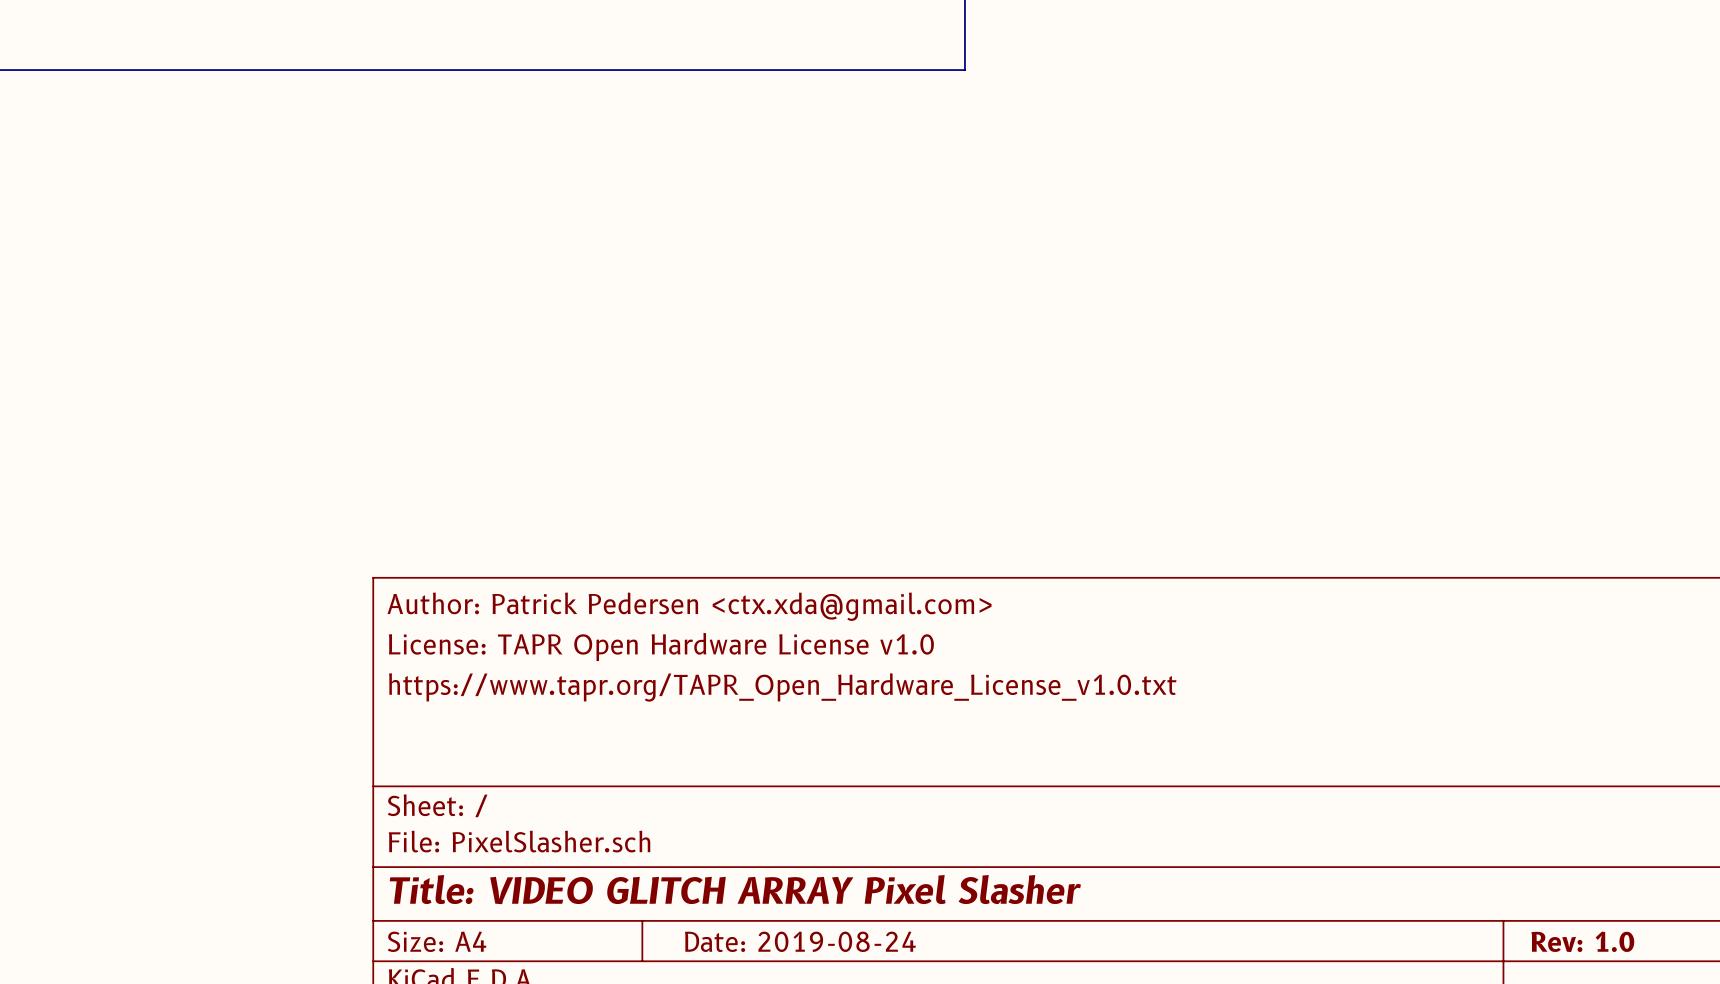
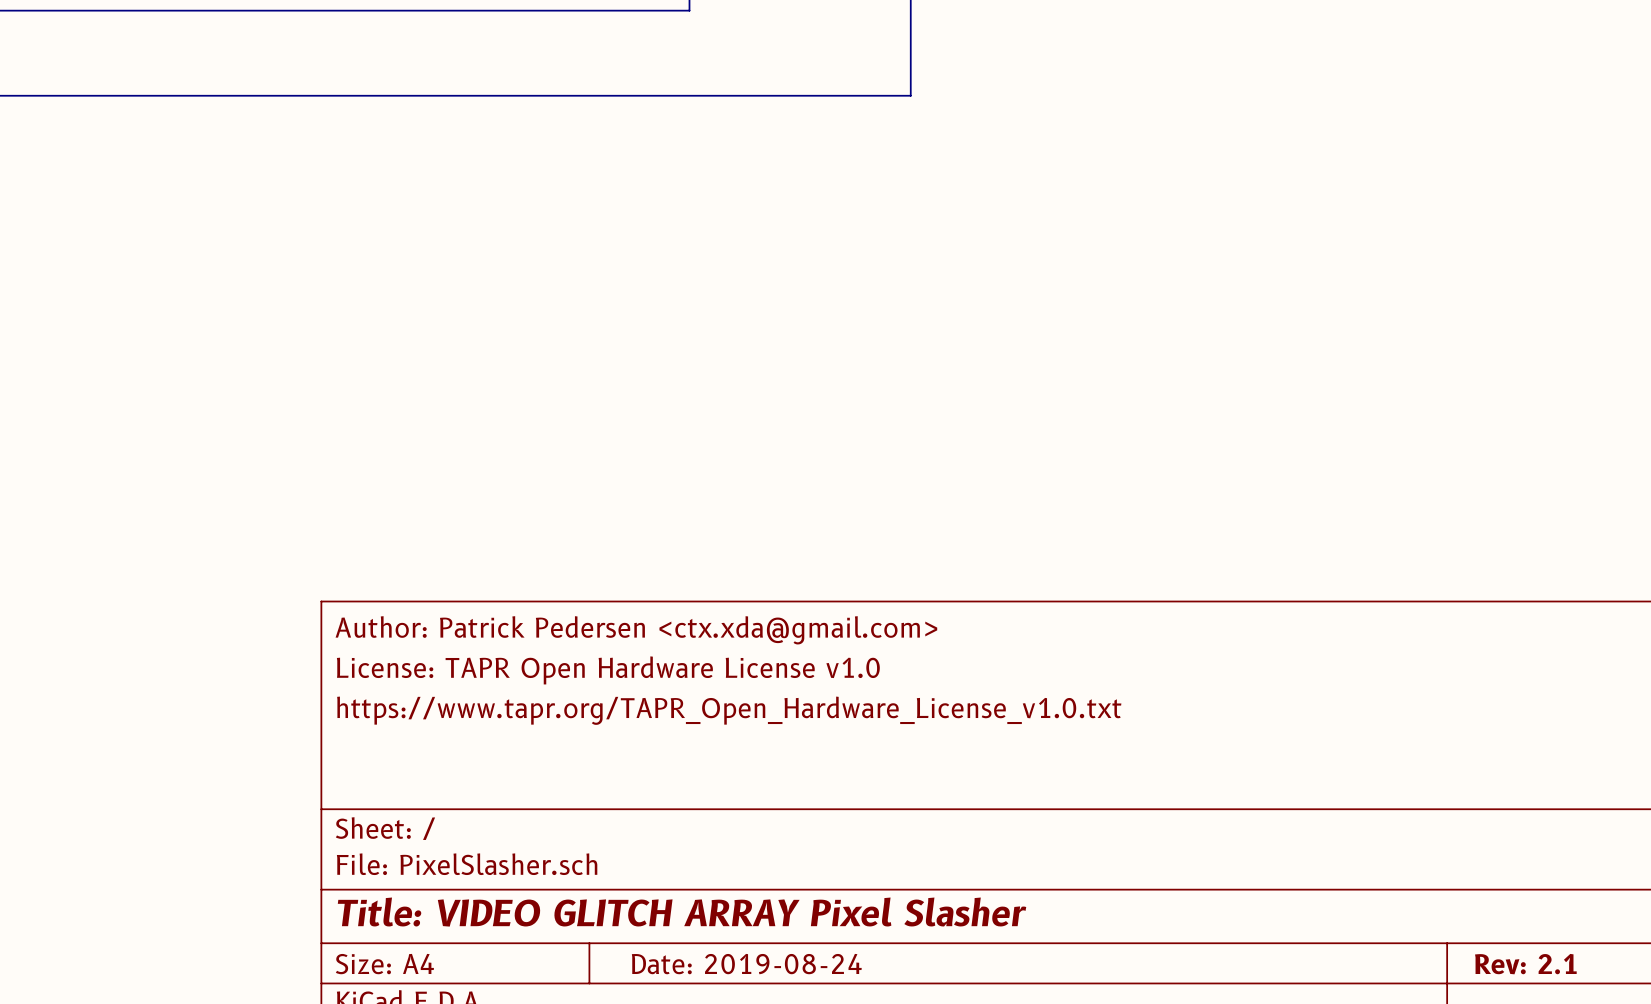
title block: Rev: 1.0 (1582, 941) -> Rev: 2.1 (1525, 964)

